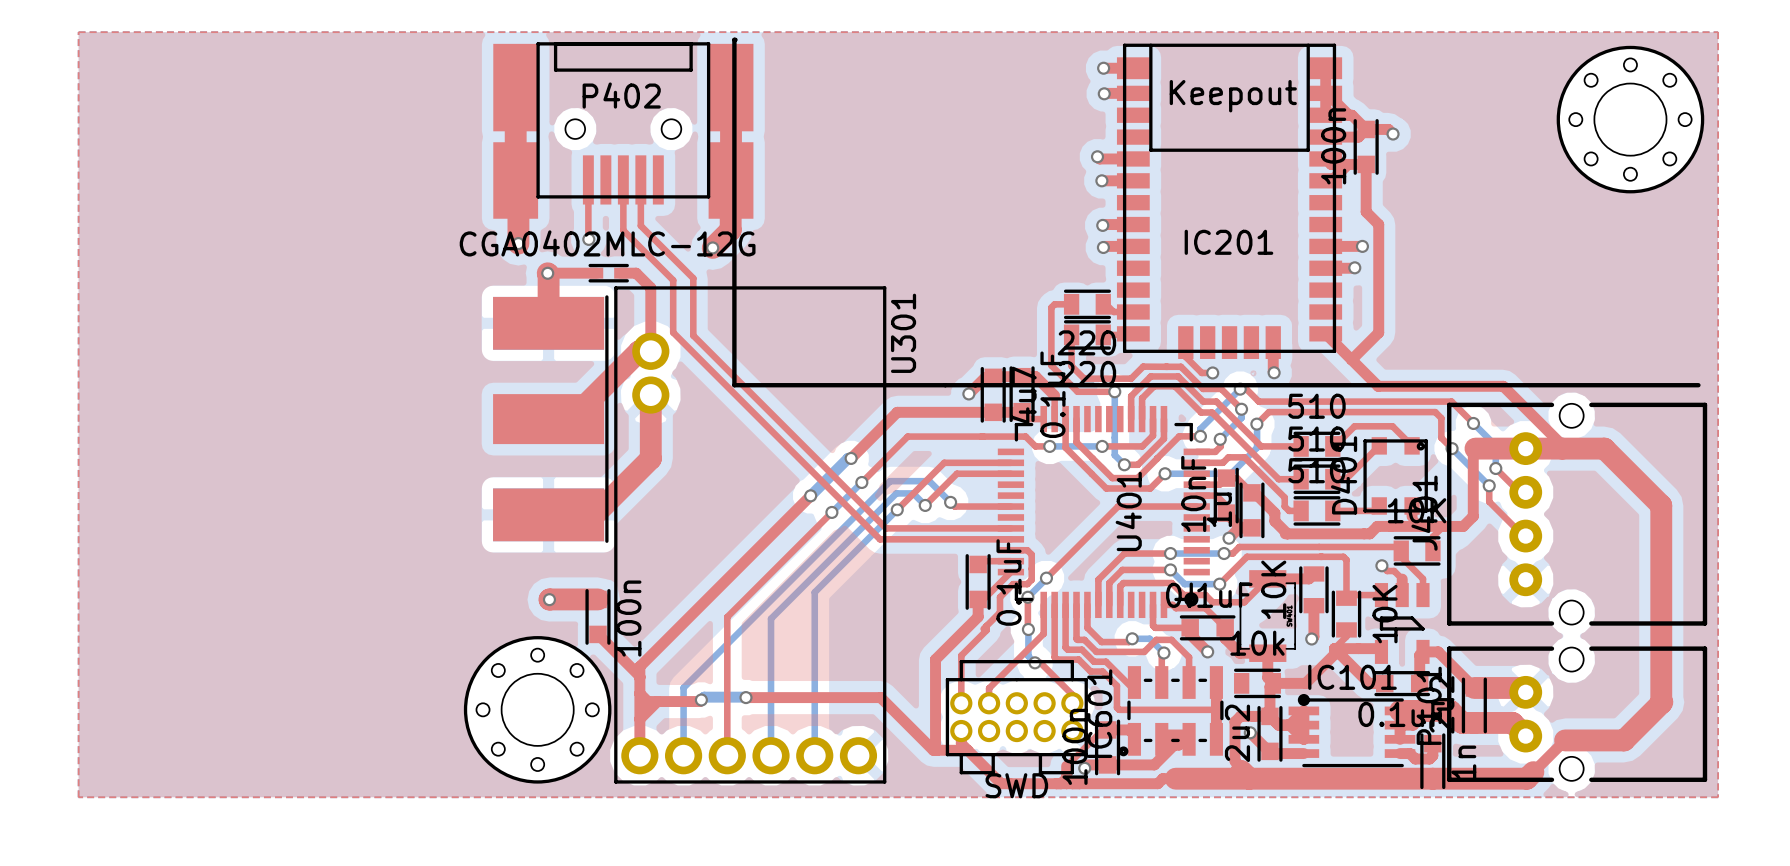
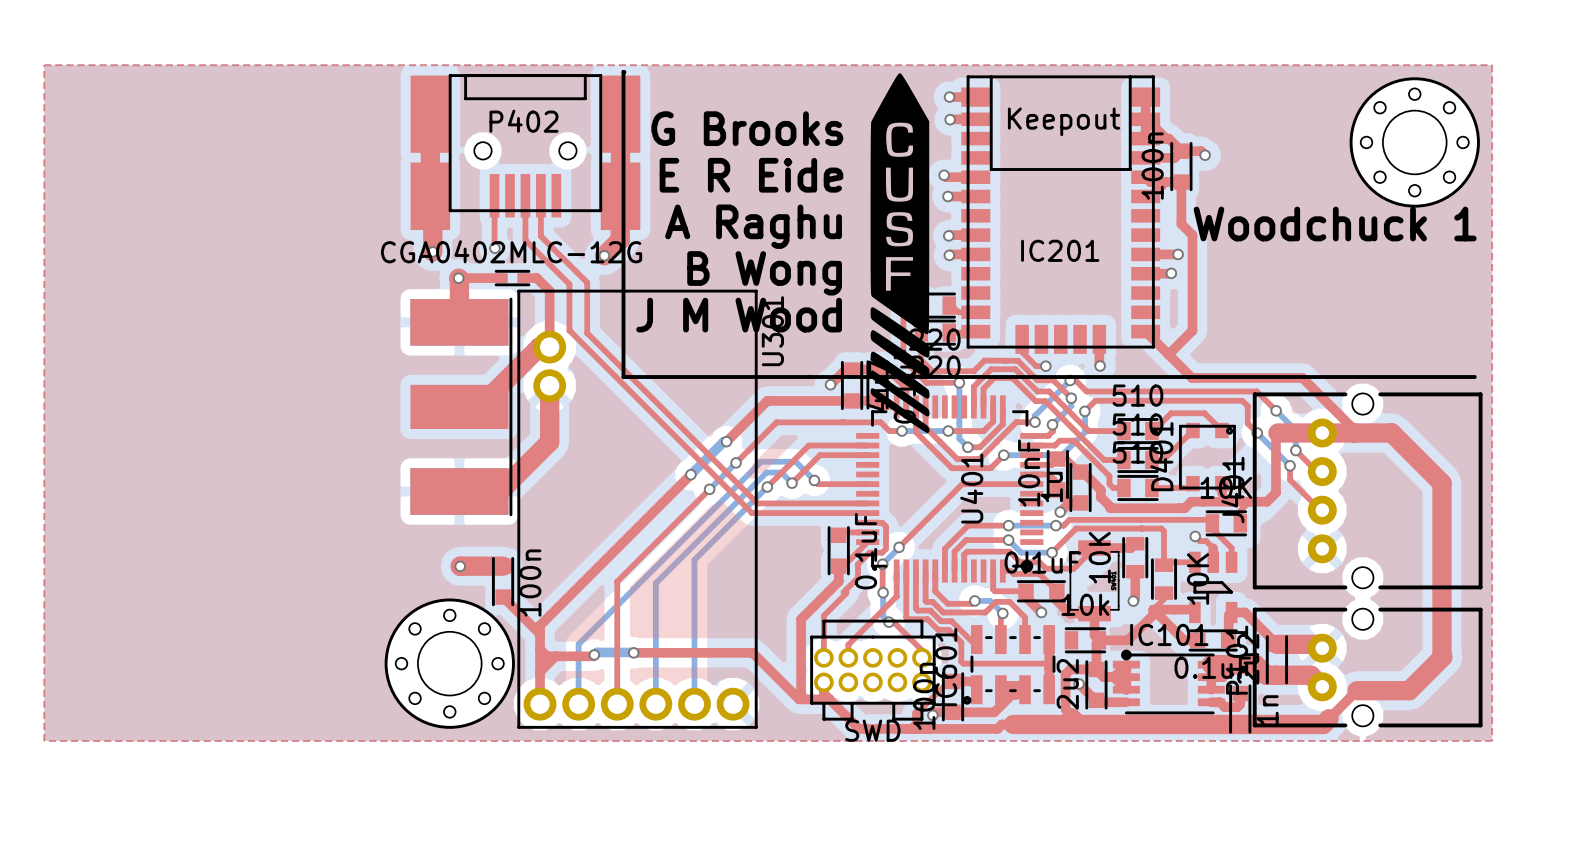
drawing: none -> [870, 73, 930, 433]
text: none -> G Brooks (747, 128)
text: none -> E R Eide (751, 175)
text: none -> Woodchuck 1 (1335, 224)
text: none -> A Raghu (753, 226)
text: none -> B Wong (764, 273)
text: none -> J M Wood (739, 315)

